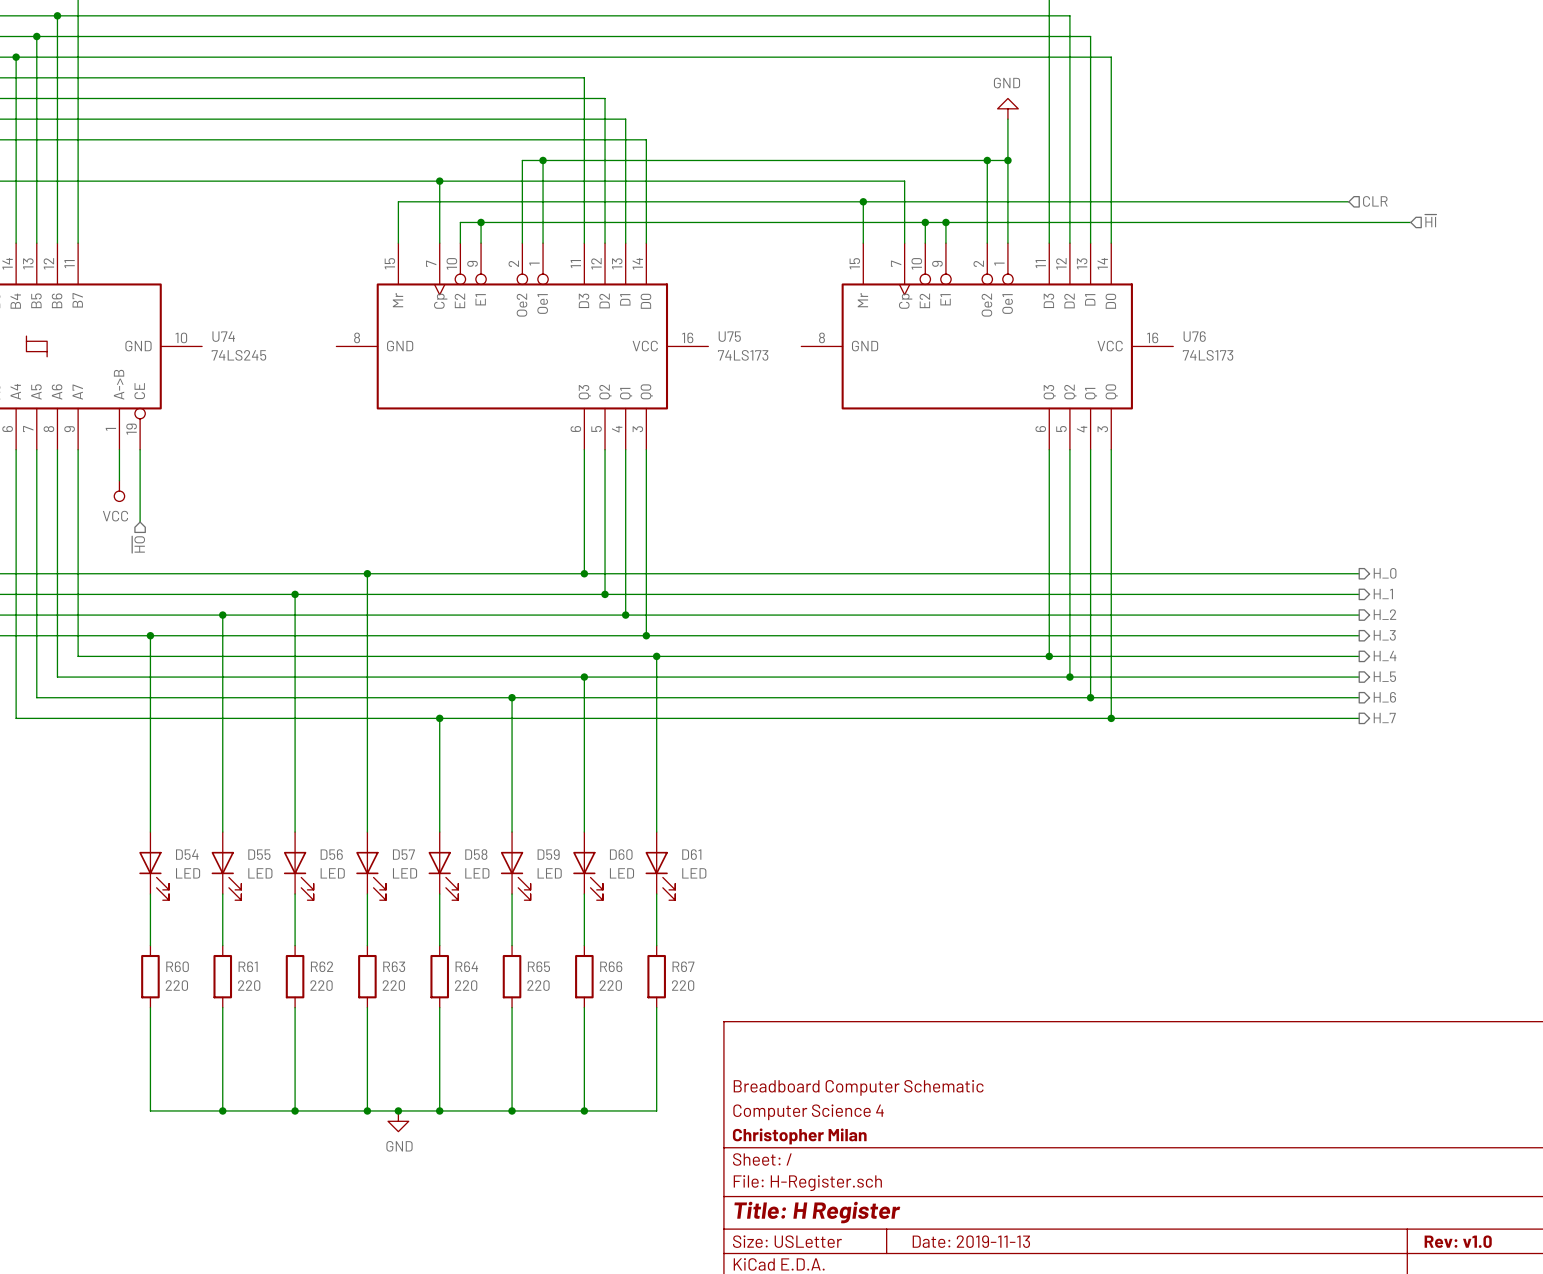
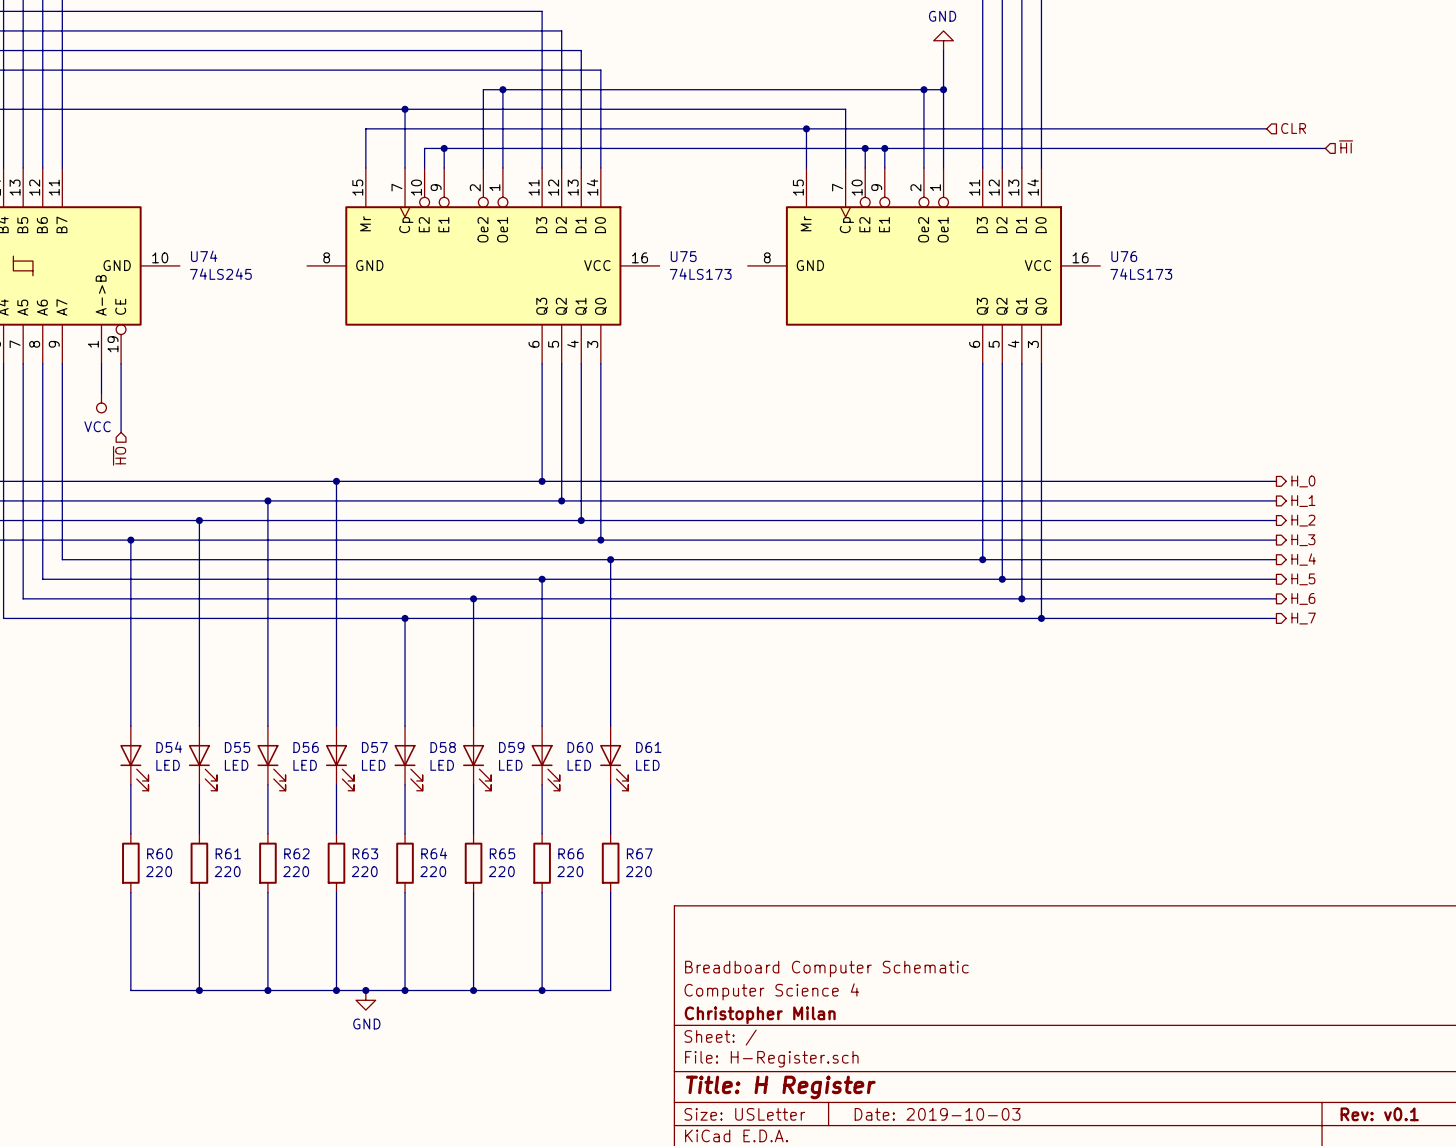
title block: Date: 2019-11-13 (971, 1241) -> Date: 2019-10-03 (937, 1114)
title block: Rev: v1.0 (1458, 1241) -> Rev: v0.1 (1379, 1114)

